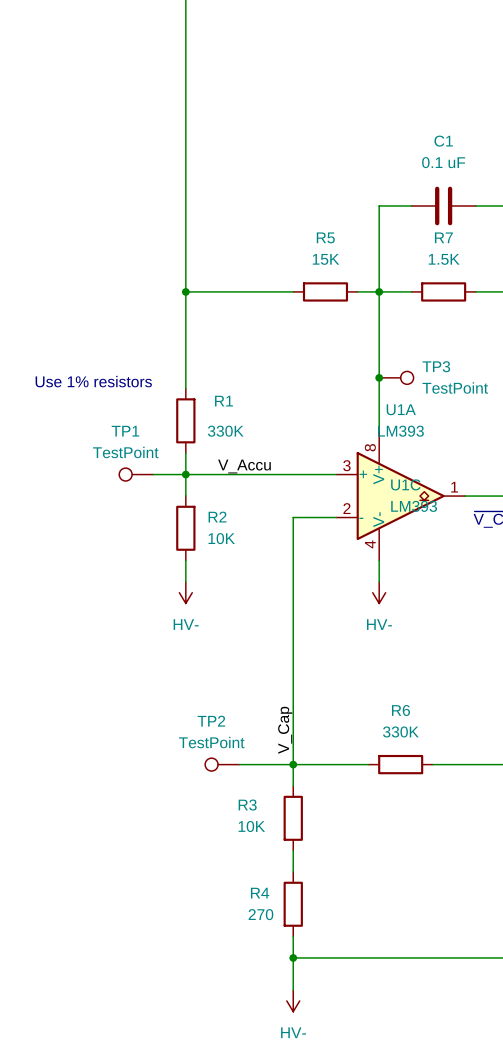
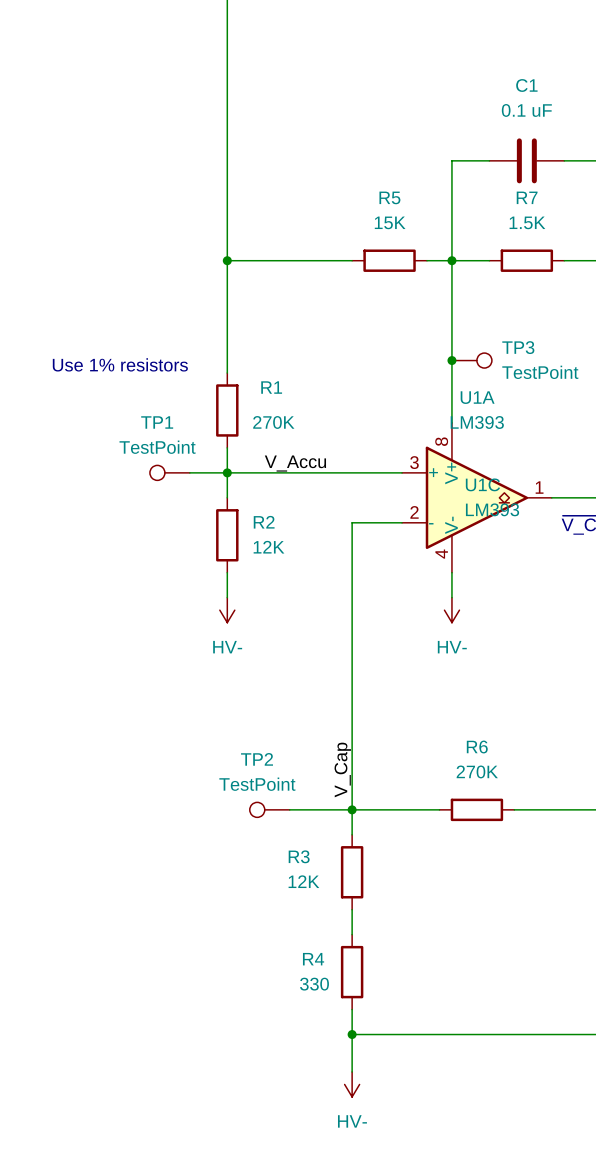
R1 value: 330K (225, 431) -> 270K (273, 422)
R2 value: 10K (221, 538) -> 12K (269, 547)
R6 value: 330K (400, 731) -> 270K (477, 771)
R3 value: 10K (251, 826) -> 12K (303, 881)
R4 value: 270 (260, 914) -> 330 (314, 984)

